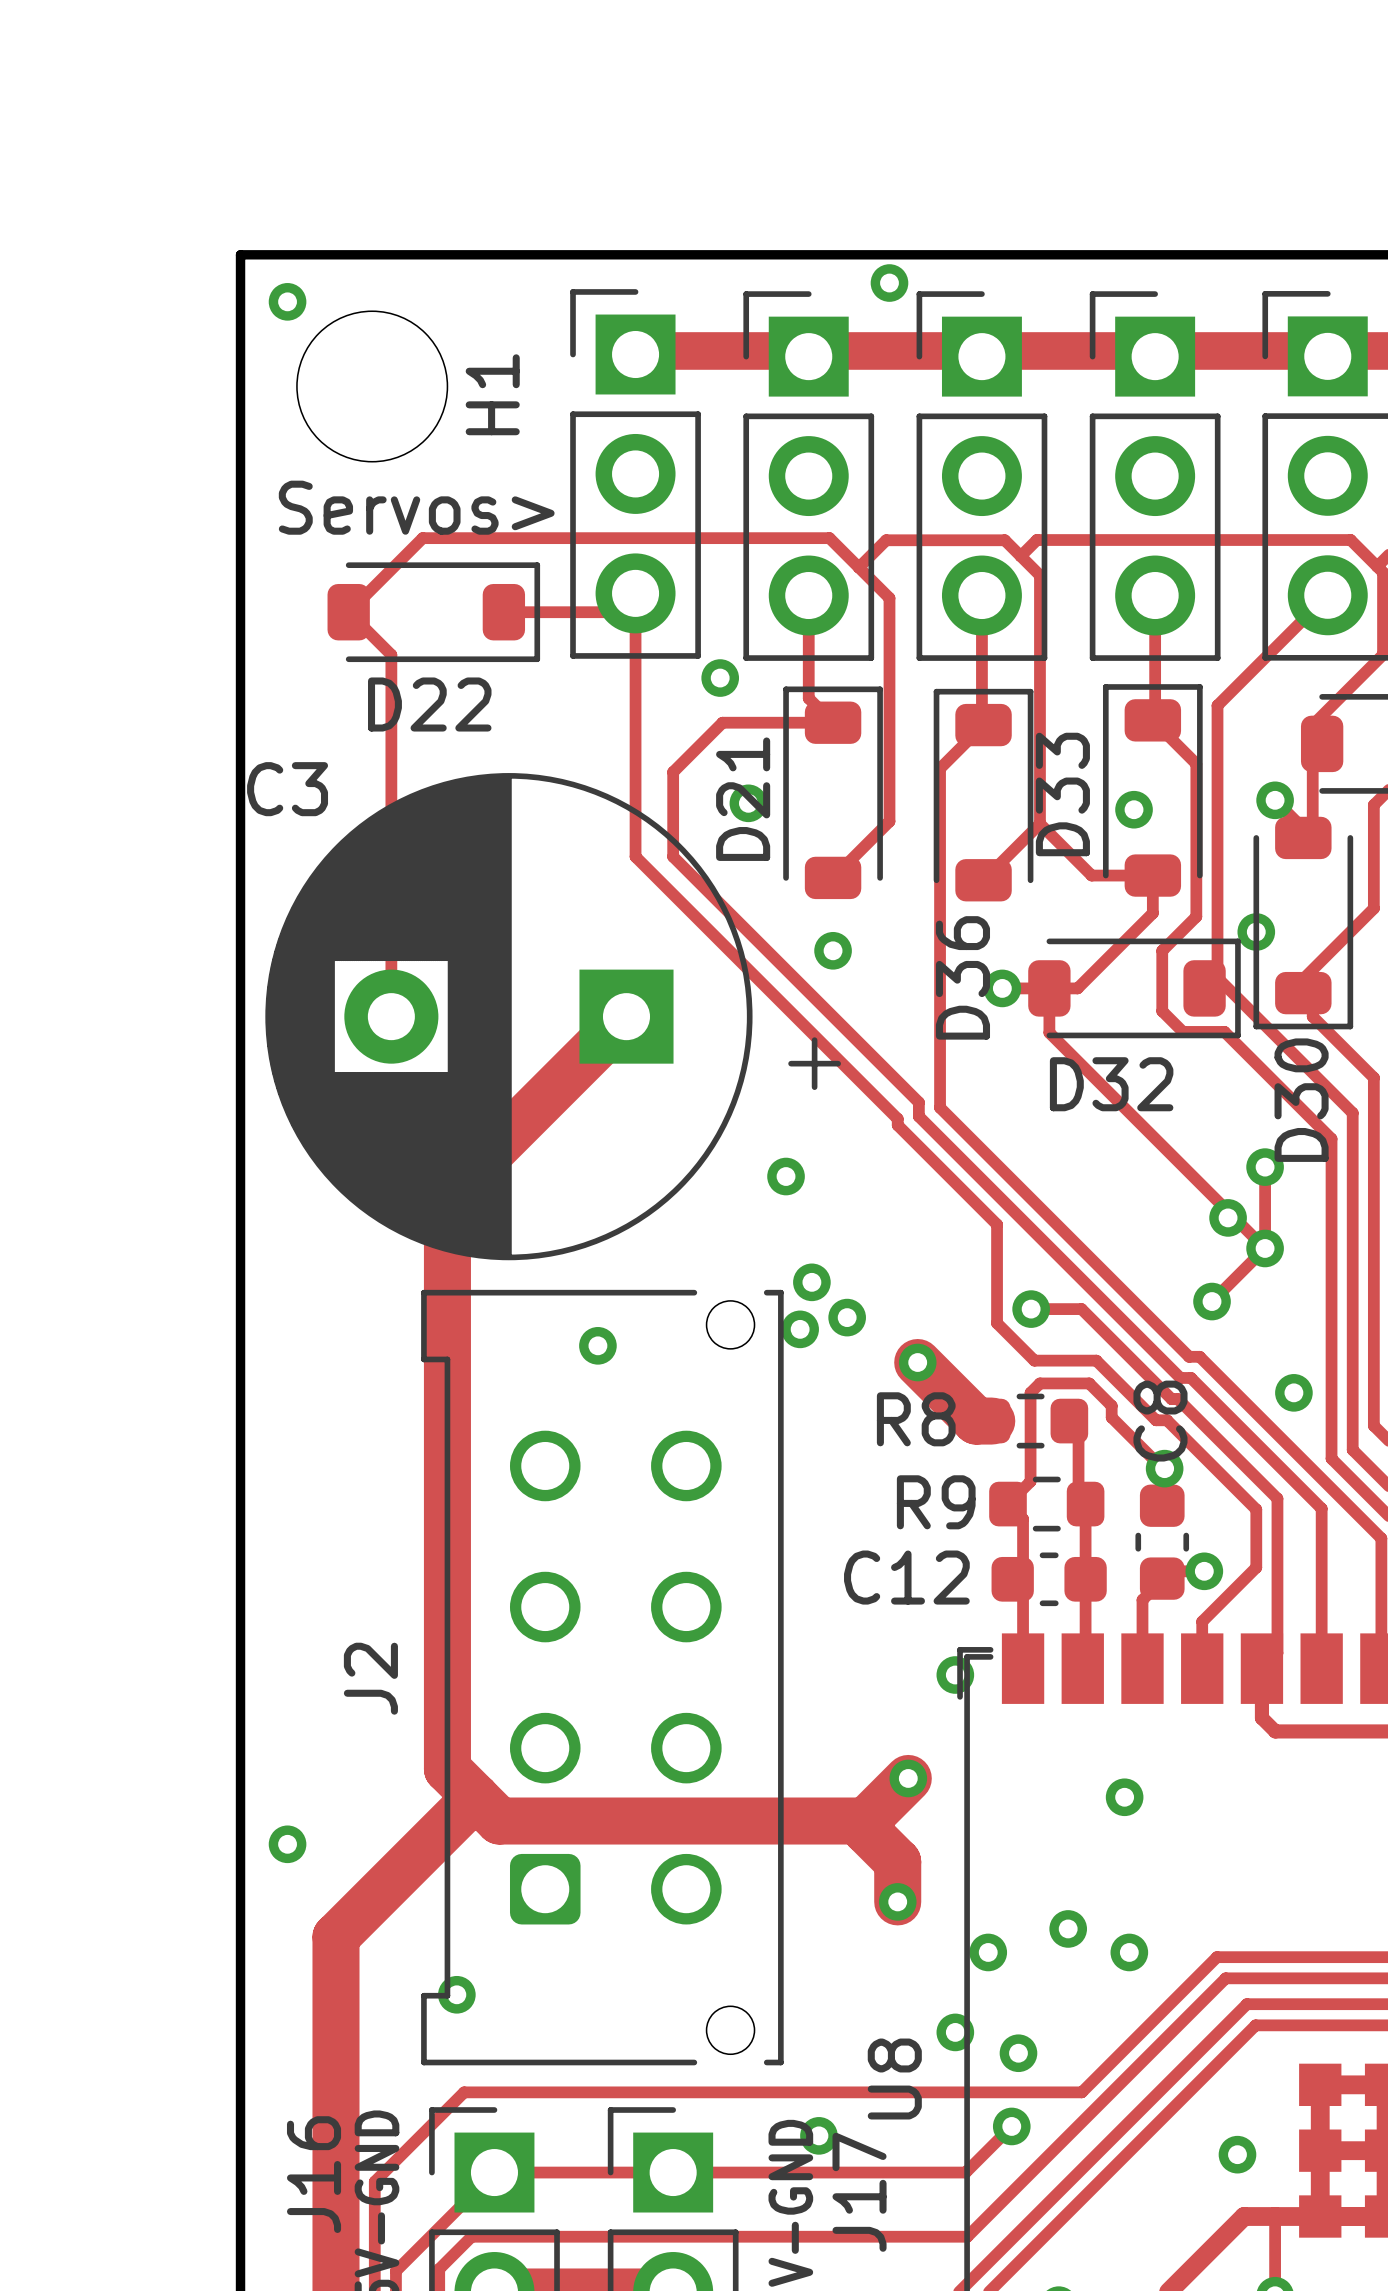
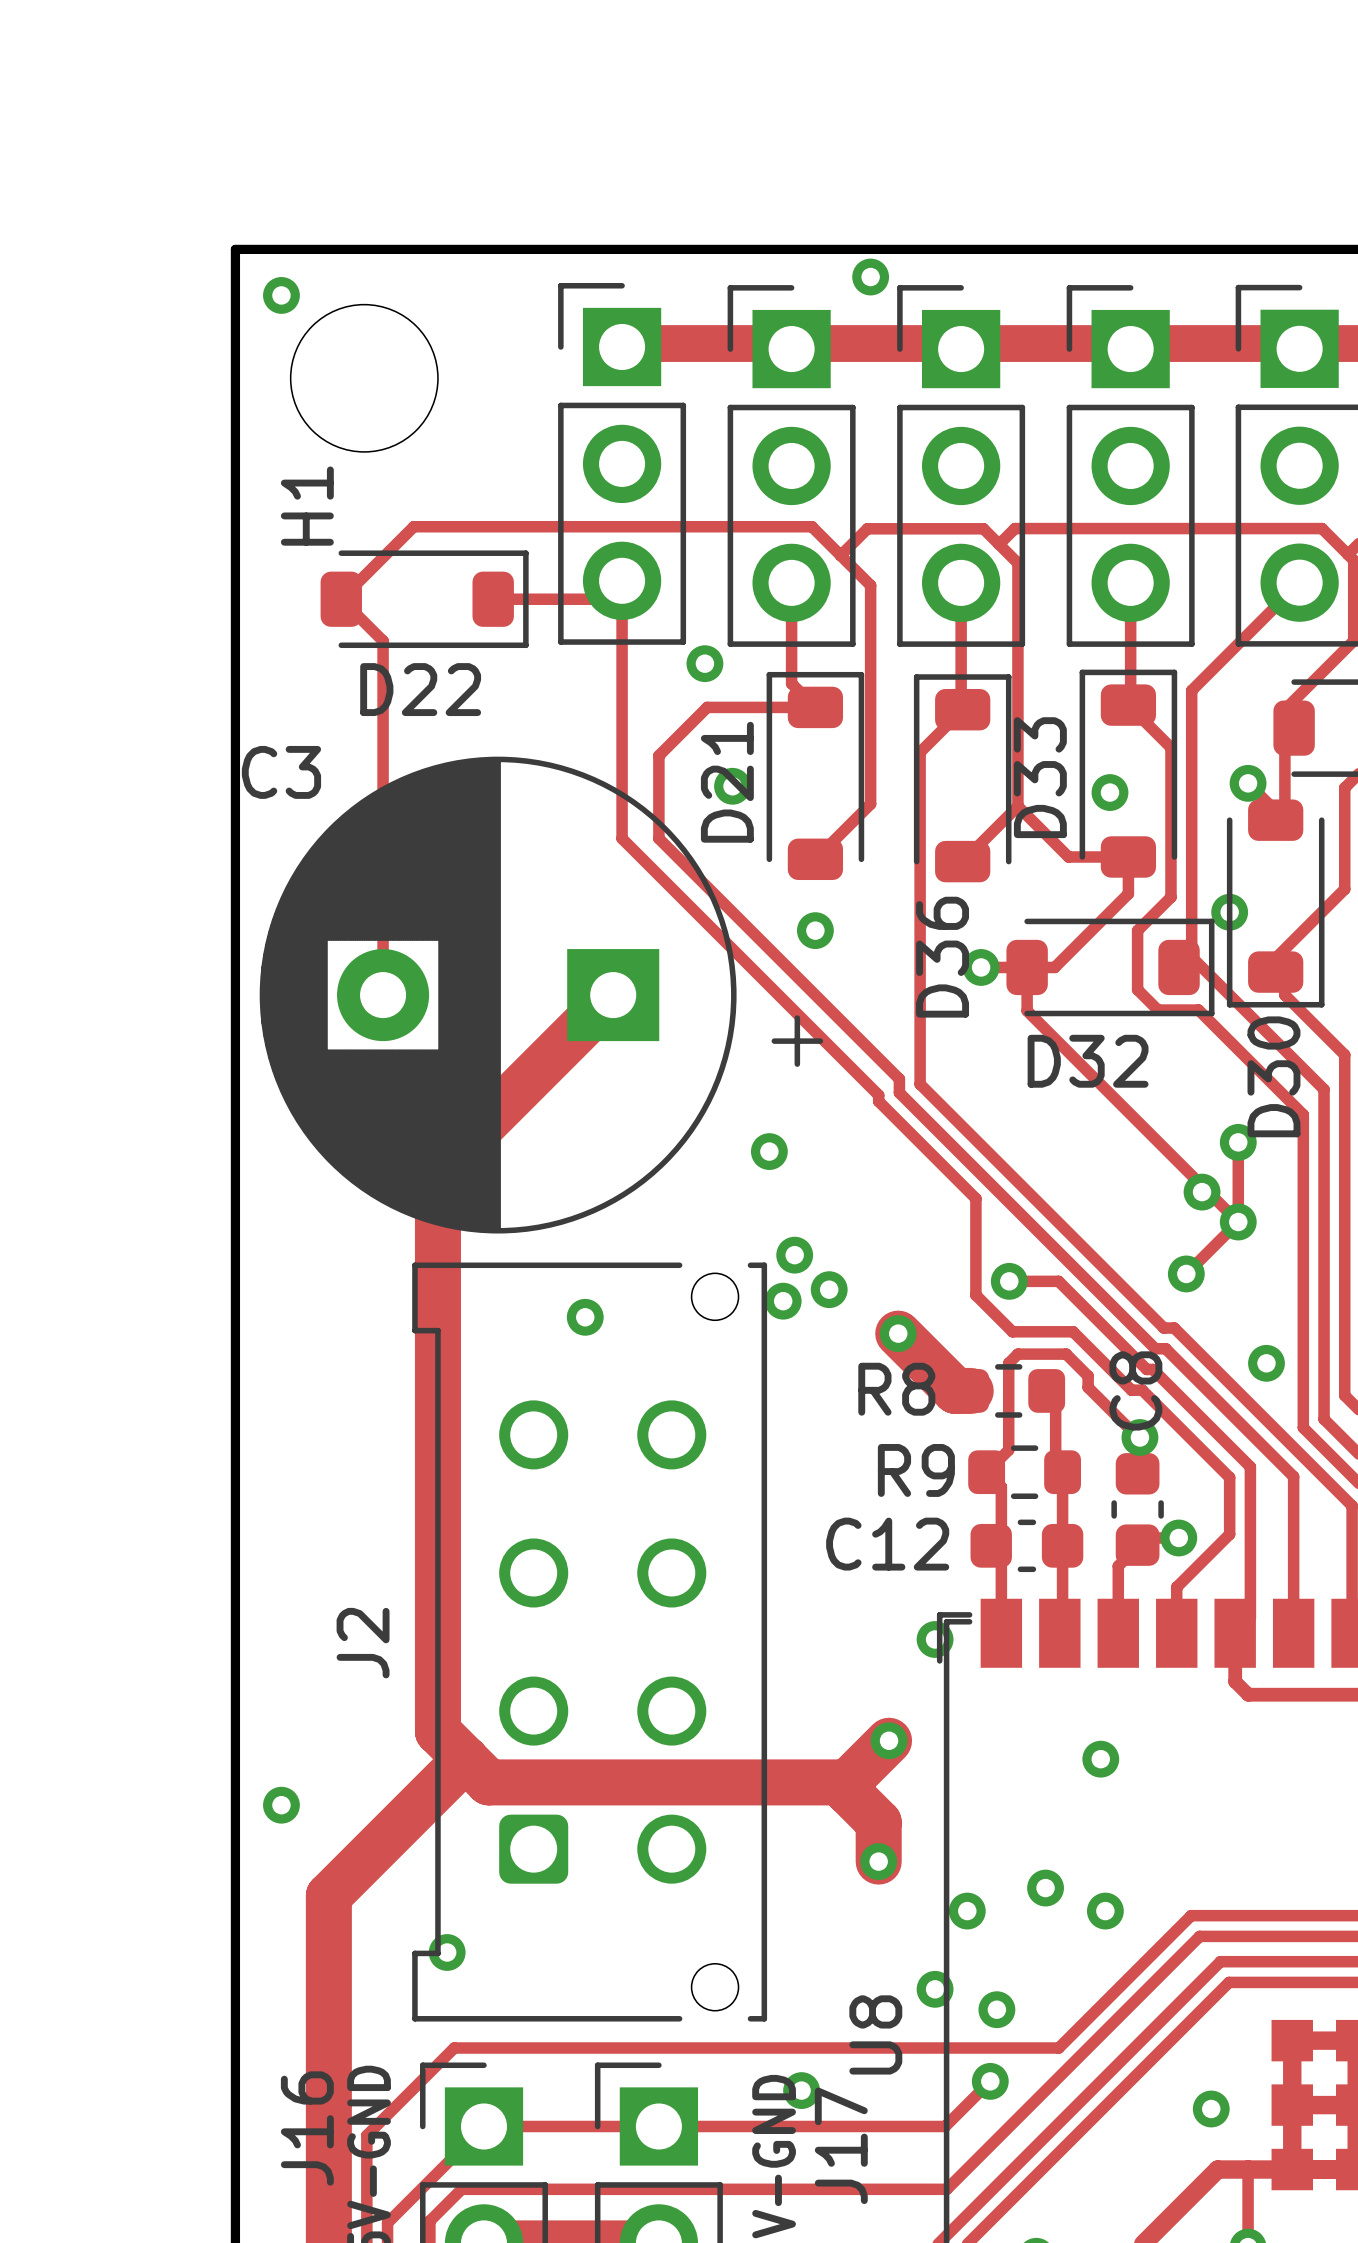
H1 name position: H1 (492, 394) -> H1 (307, 506)
text: Servos> (416, 507) -> none

